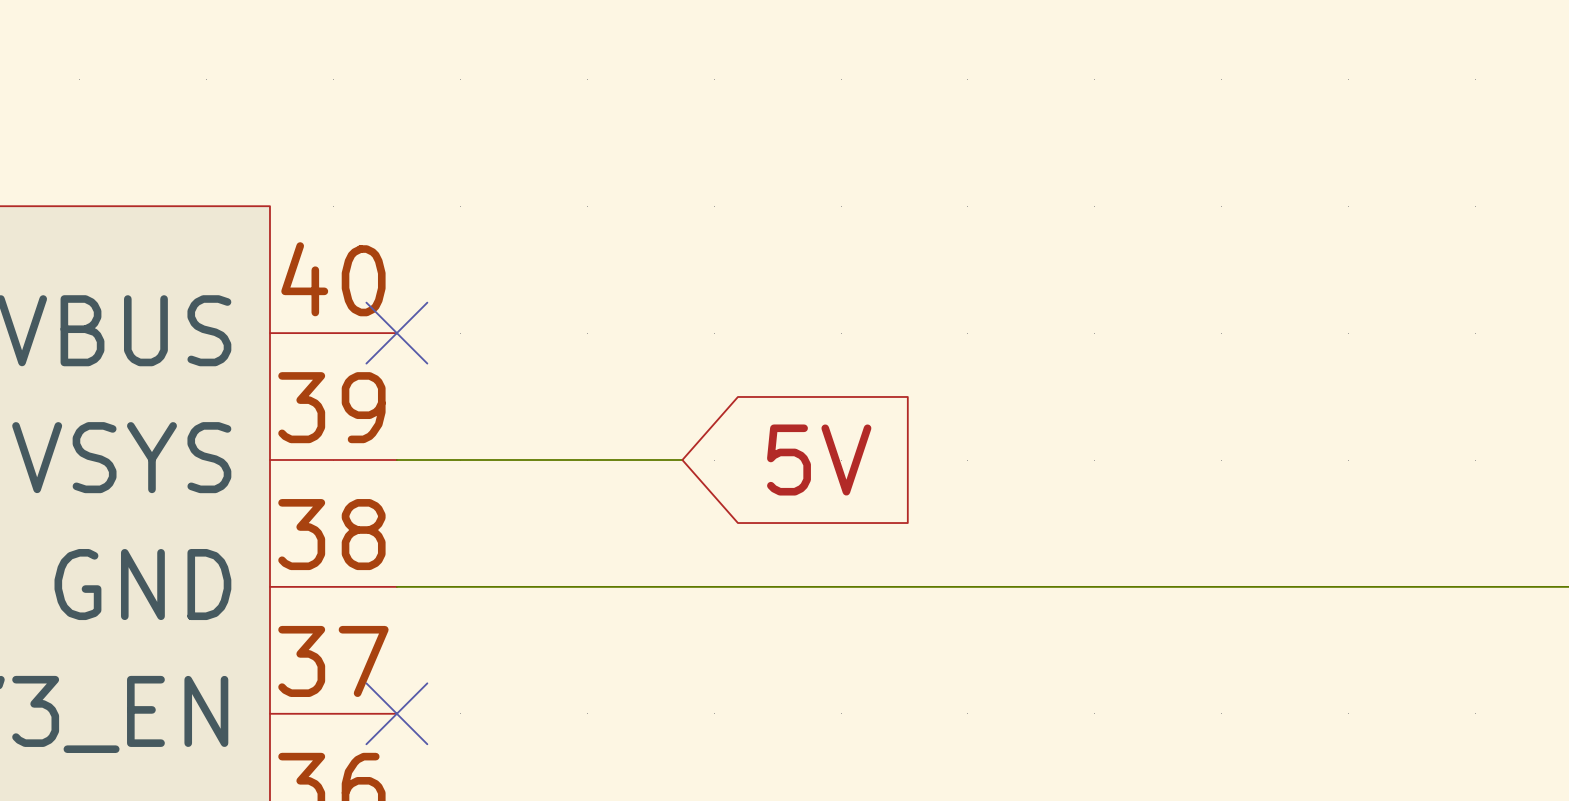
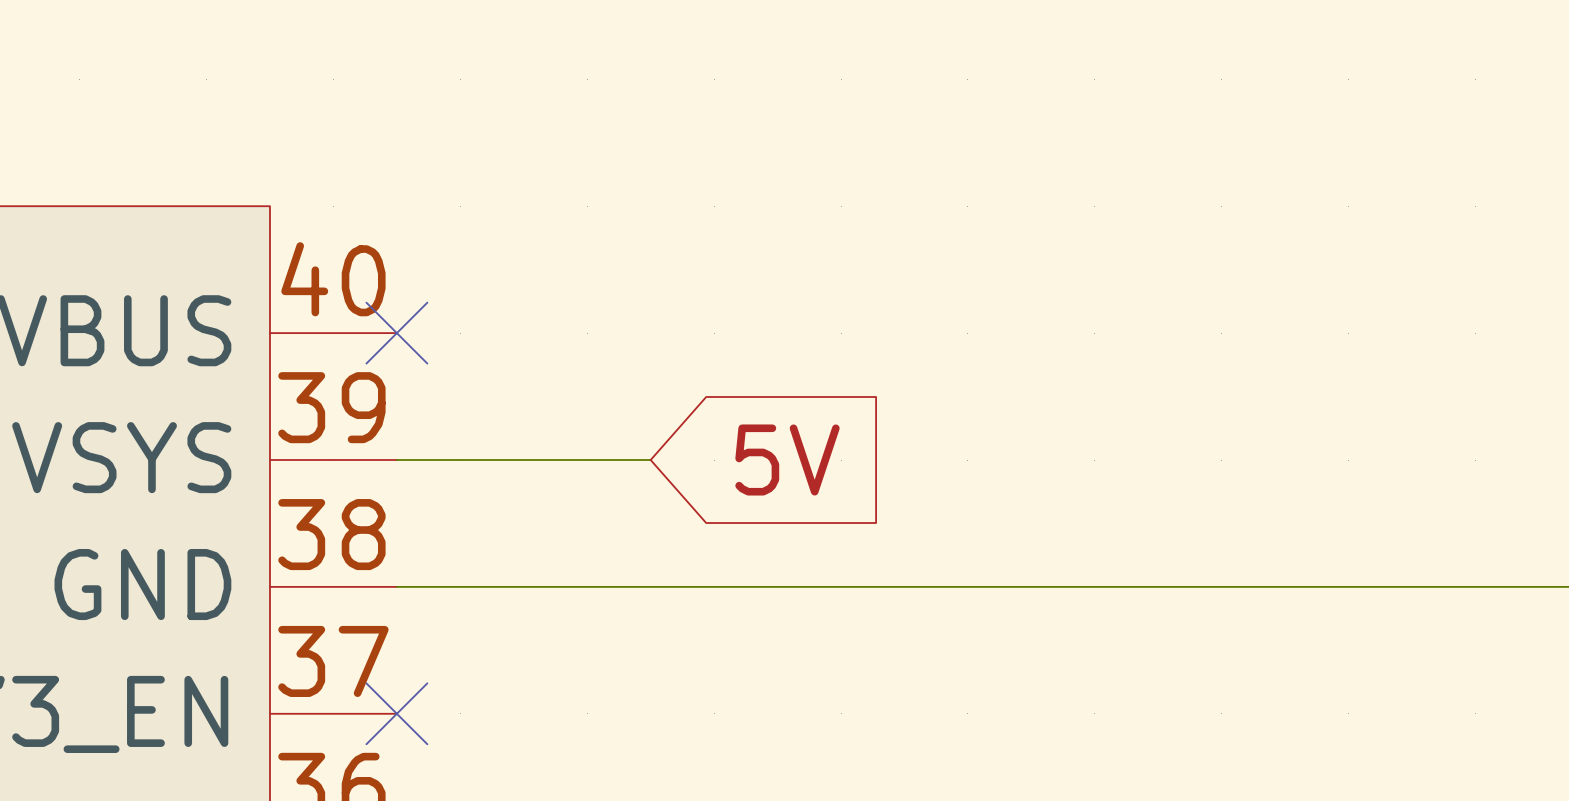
wire: (650, 460) (682, 460) -> none
global label position: 5V (819, 460) -> 5V (787, 460)

